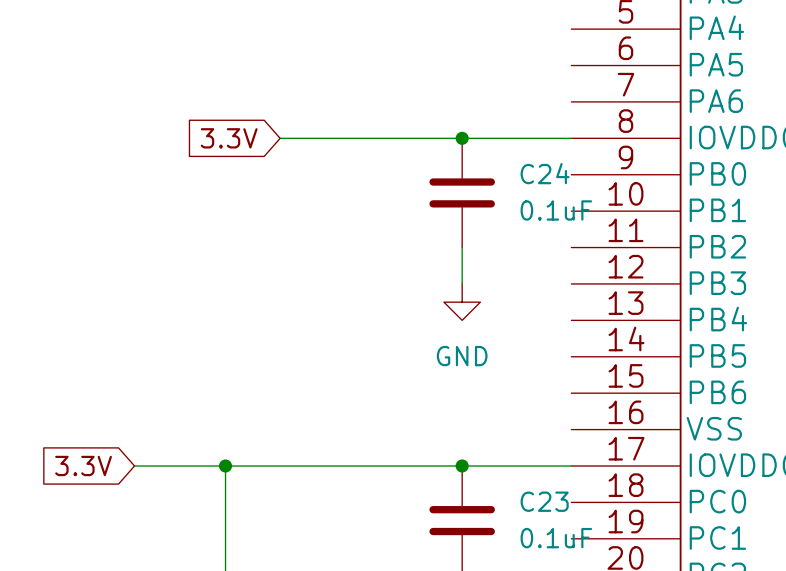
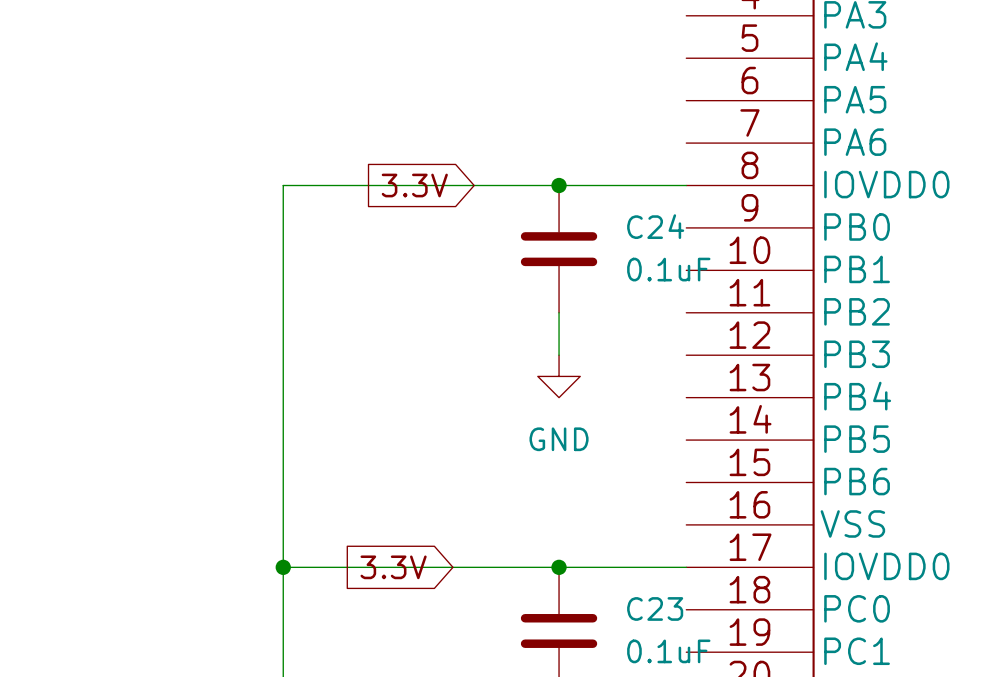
global label position: 3.3V (229, 138) -> 3.3V (414, 185)
global label: 3.3V (83, 465) -> none
wire: (134, 465) (225, 465) -> (346, 185) (283, 185) (283, 567)
global label: none -> 3.3V (393, 567)

